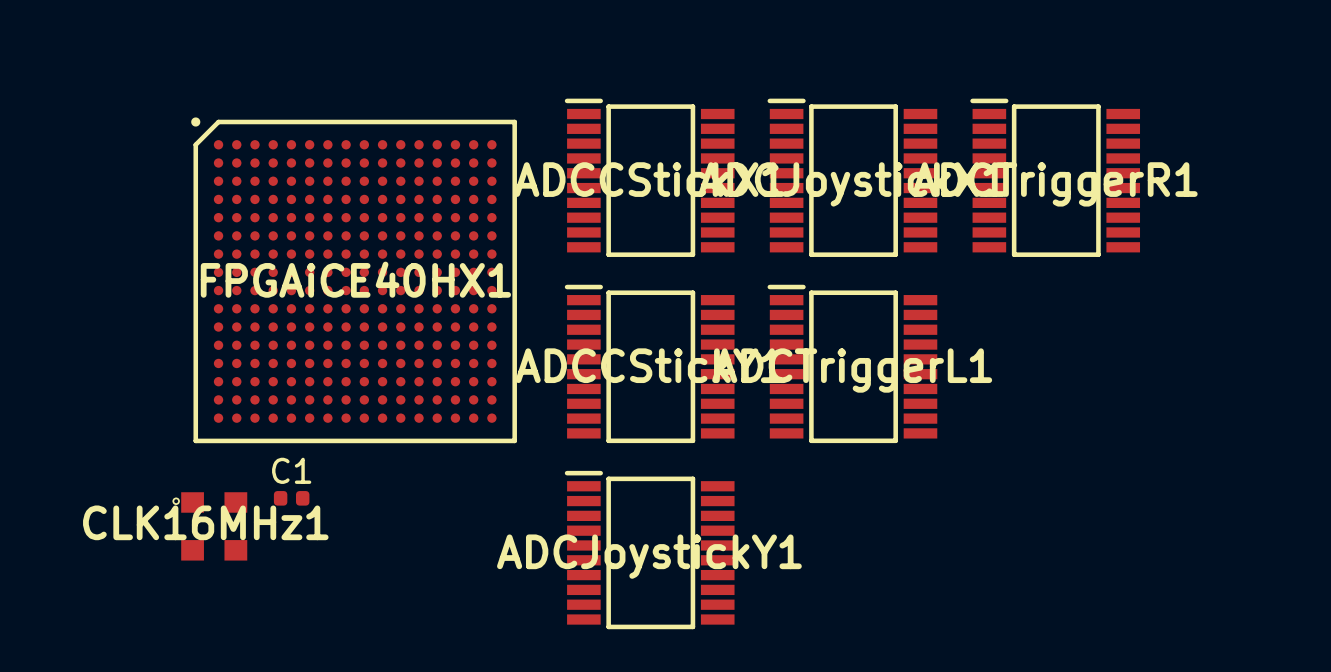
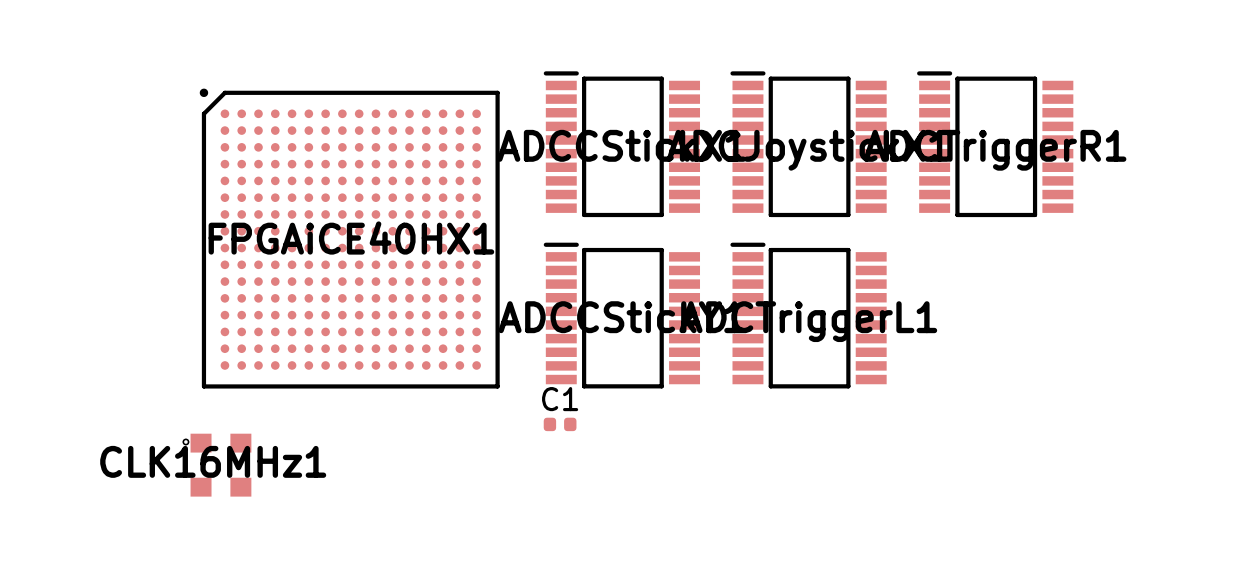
C1 position: (291, 498) -> (560, 424)
ADCJoystickY1: (649, 550) -> none

